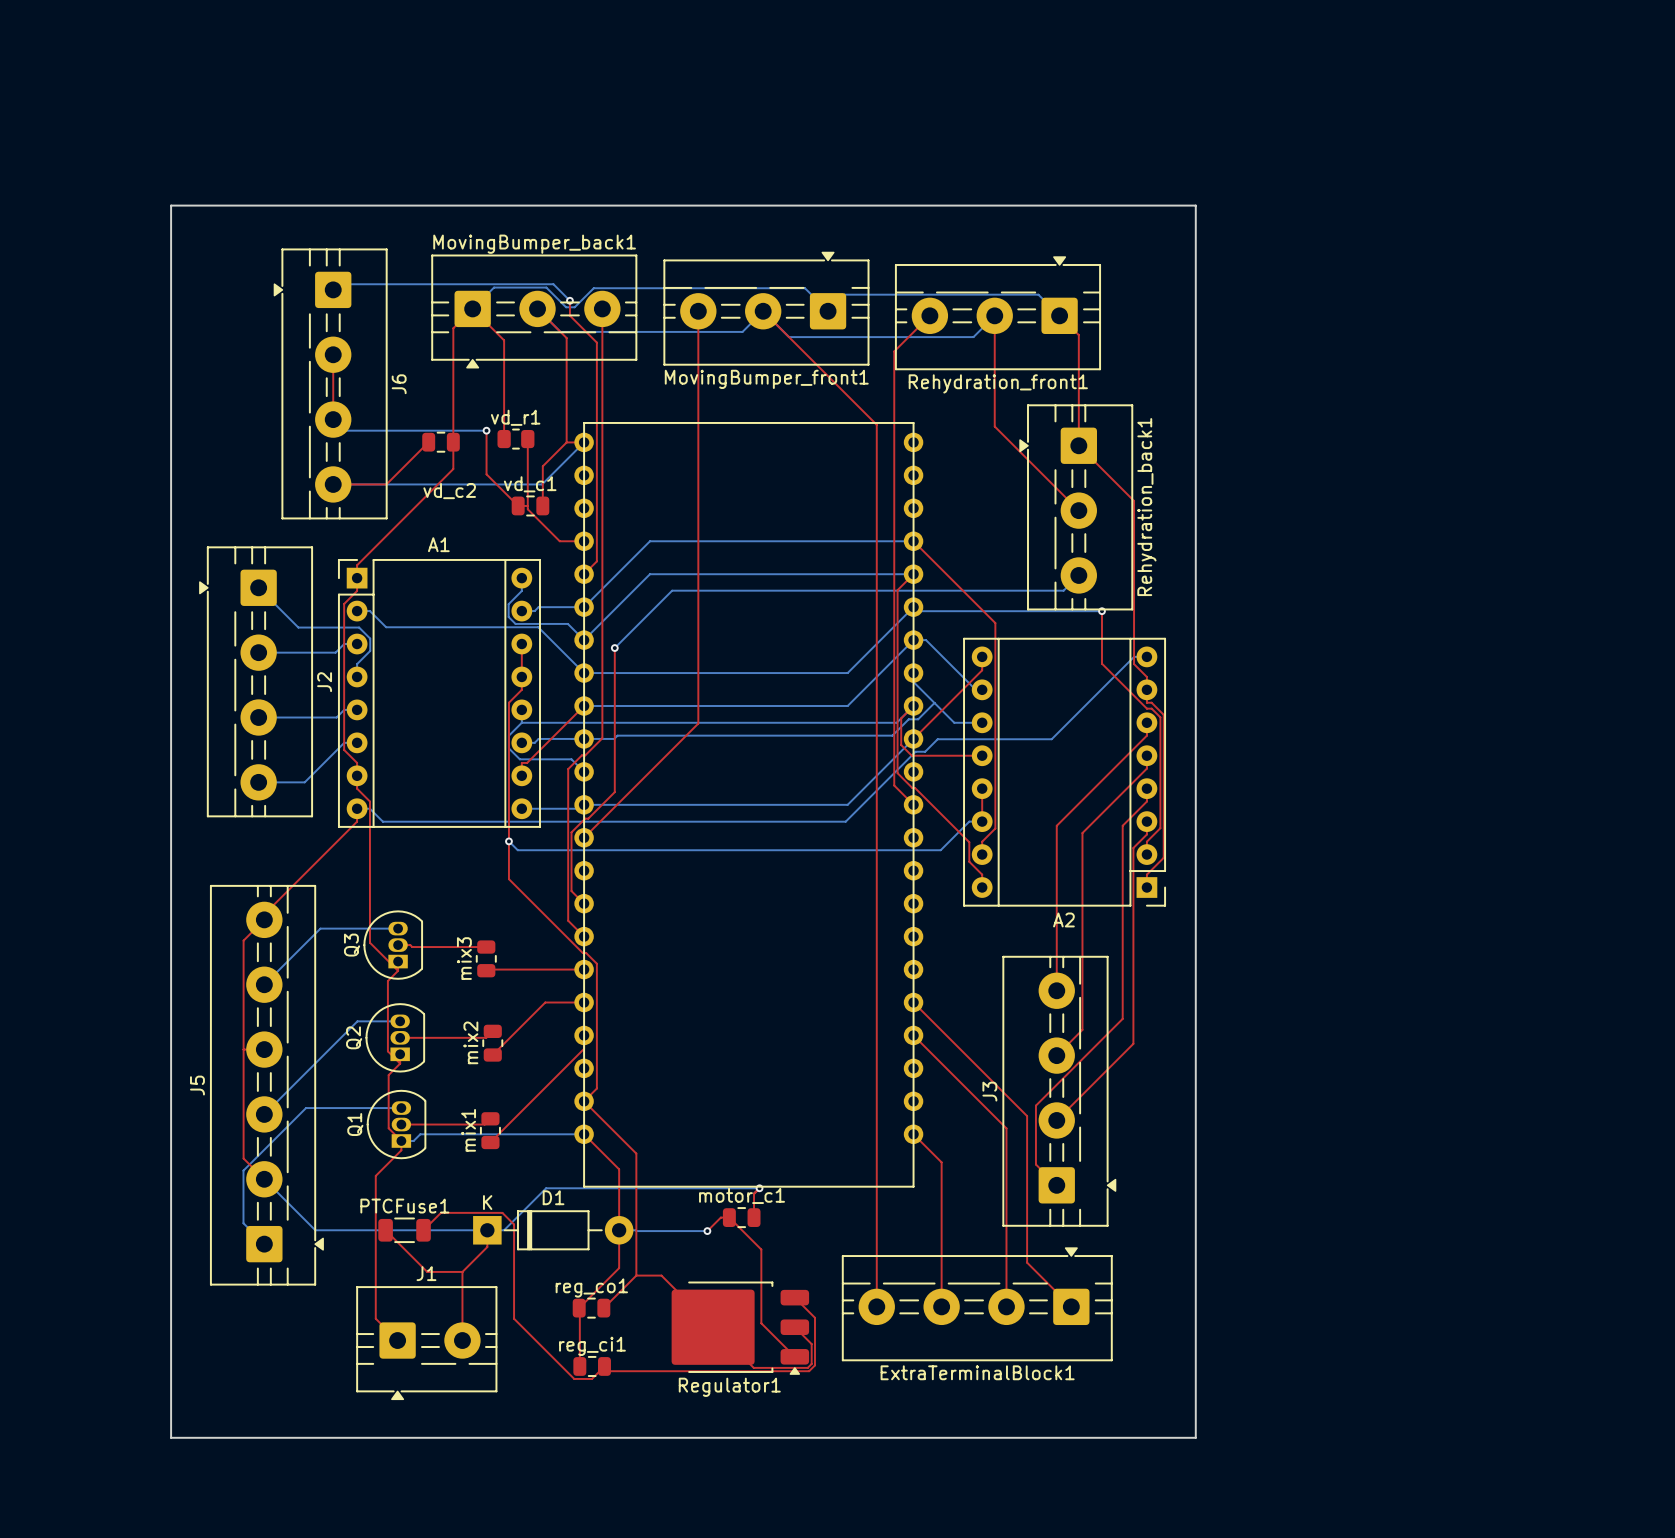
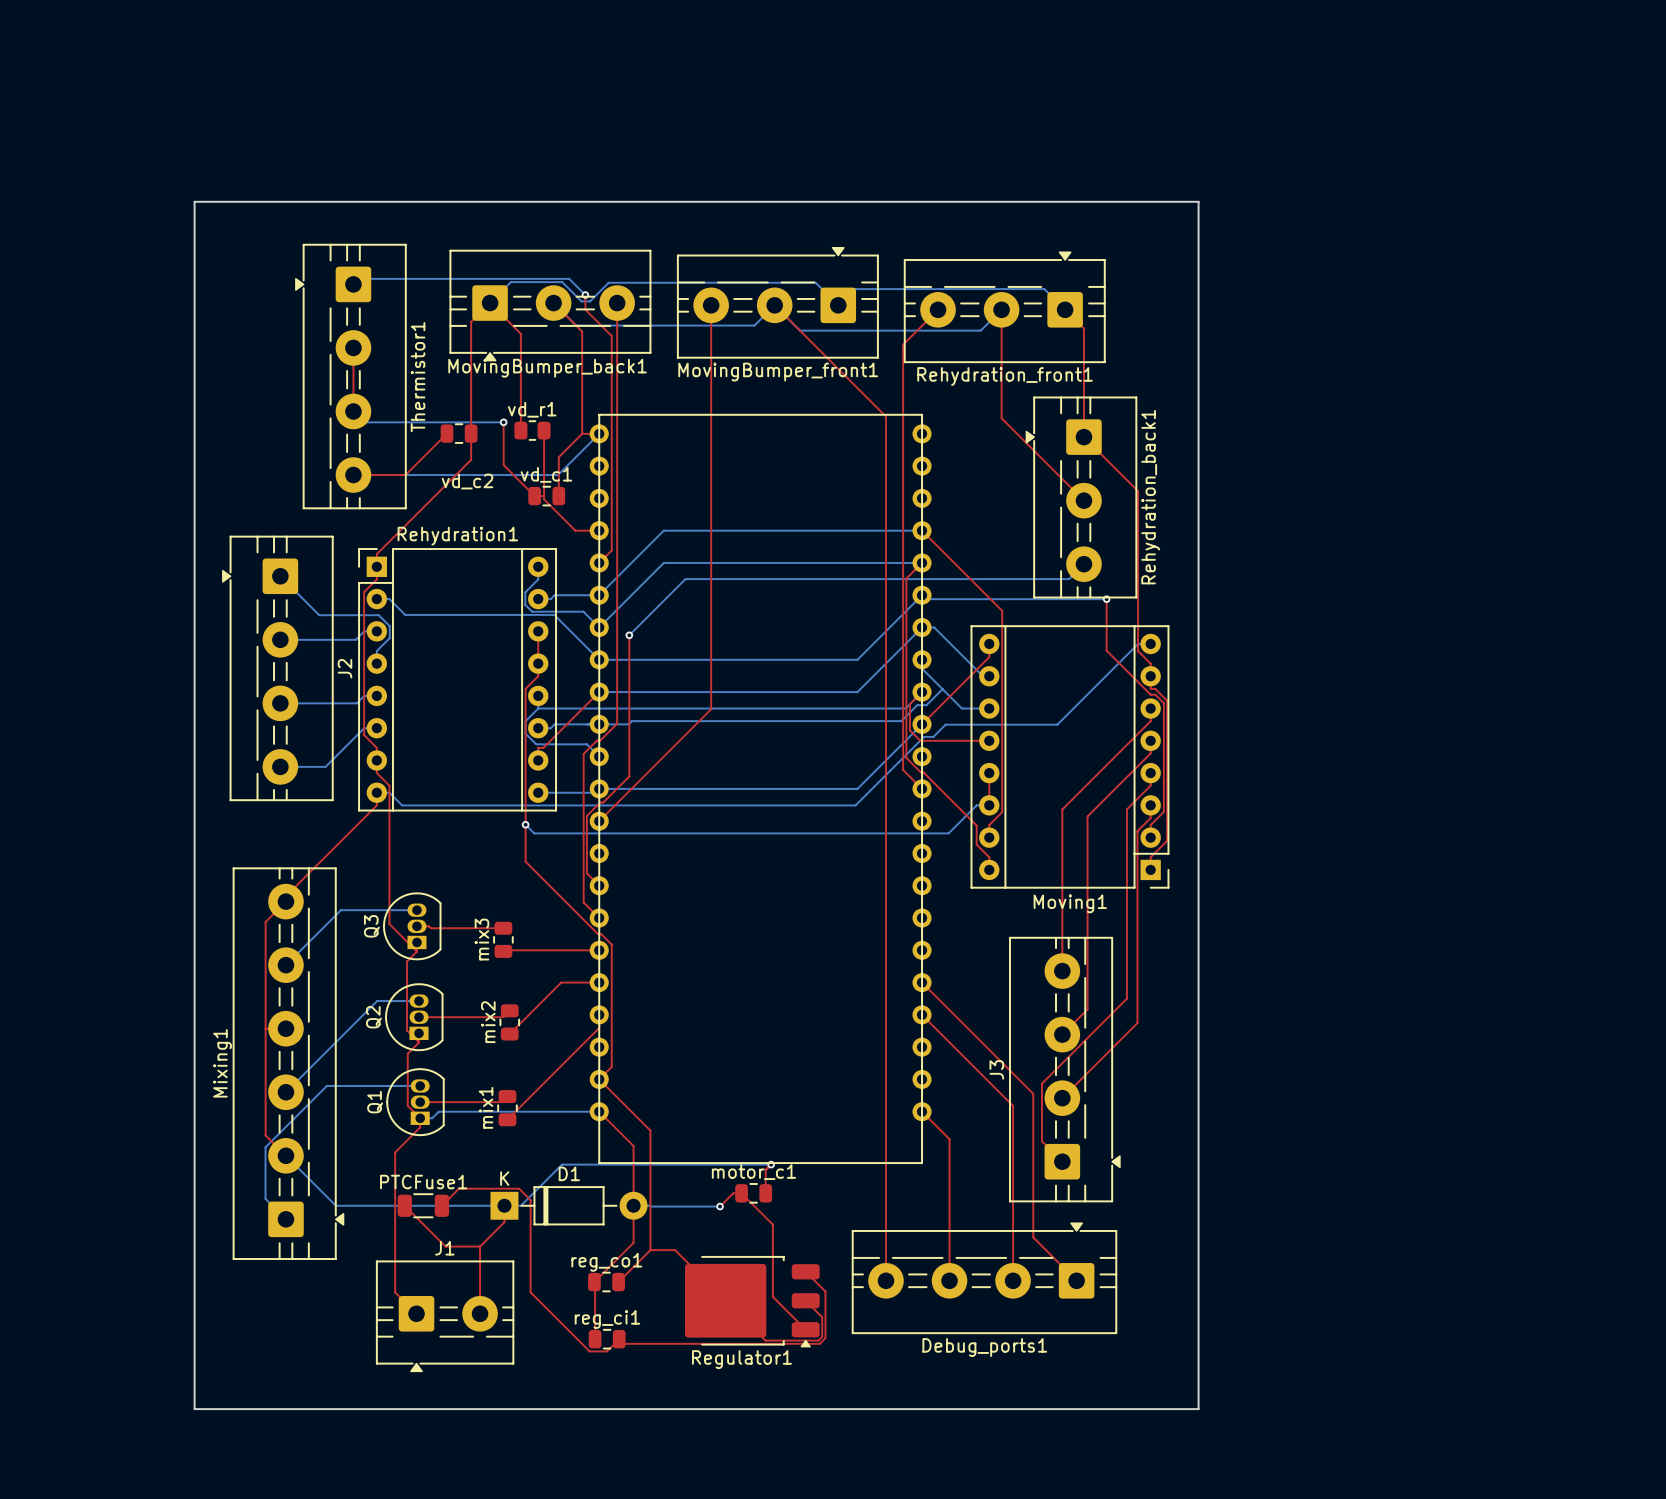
MovingBumper_back1 name position: MovingBumper_back1 (534, 244) -> MovingBumper_back1 (547, 368)
J6 name: J6 (399, 384) -> Thermistor1 (418, 377)
A1 name: A1 (438, 544) -> Rehydration1 (457, 536)
A2 name: A2 (1063, 919) -> Moving1 (1070, 903)
J5 name: J5 (197, 1085) -> Mixing1 (222, 1063)
ExtraTerminalBlock1 name: ExtraTerminalBlock1 (977, 1372) -> Debug_ports1 (984, 1347)

